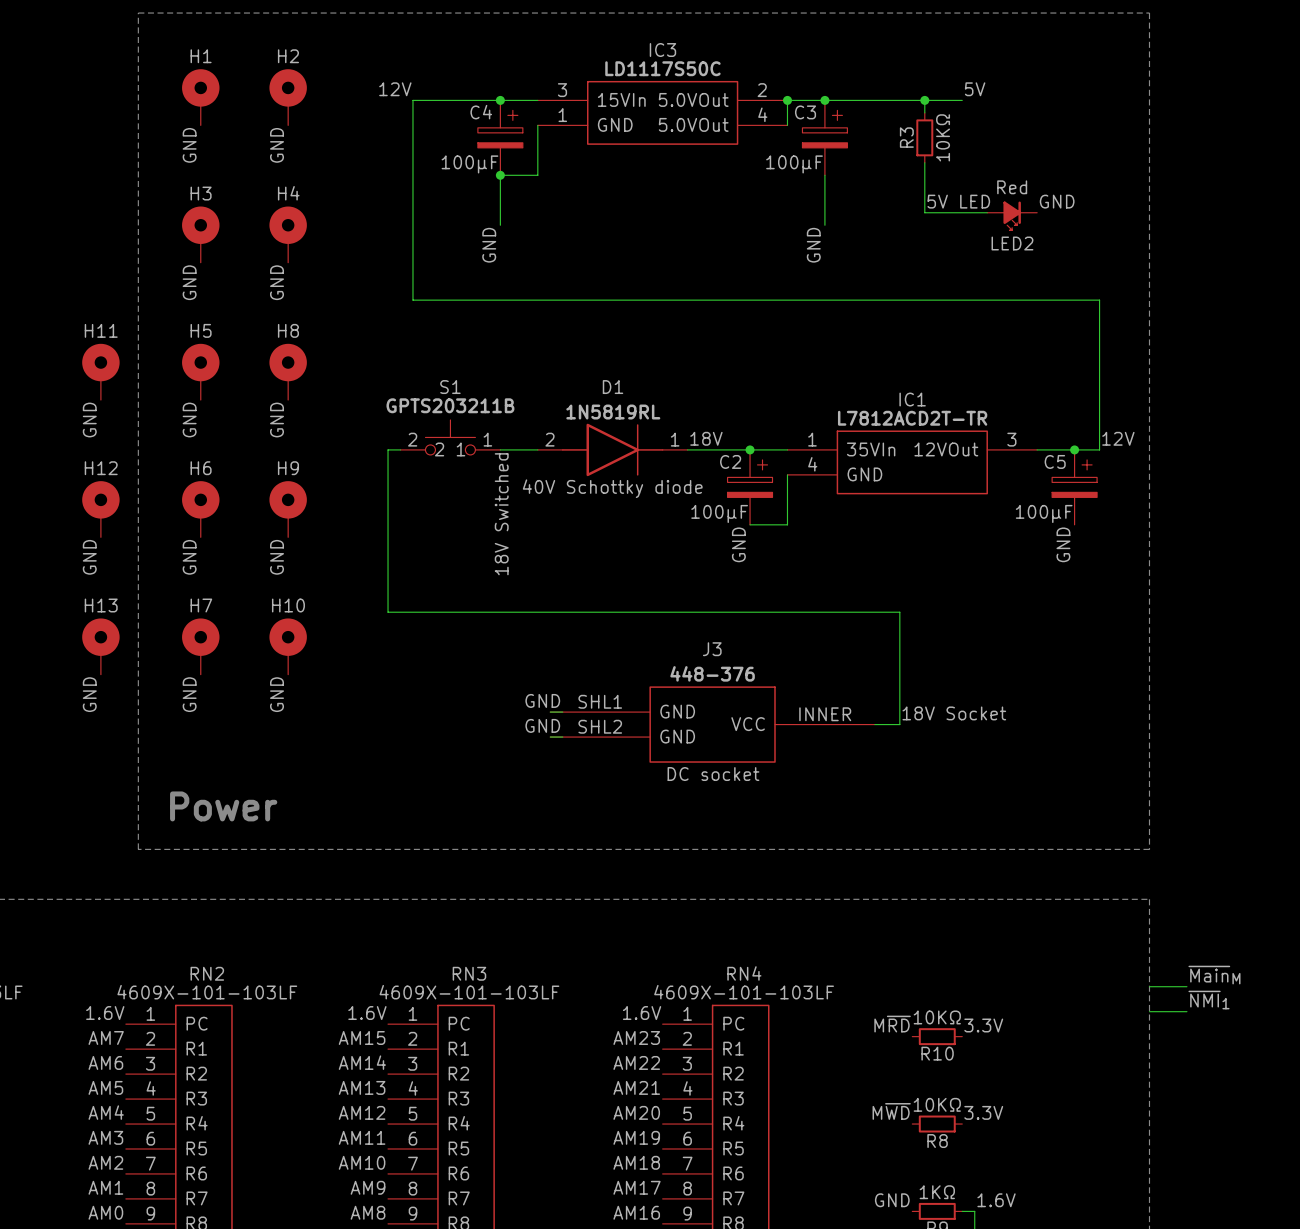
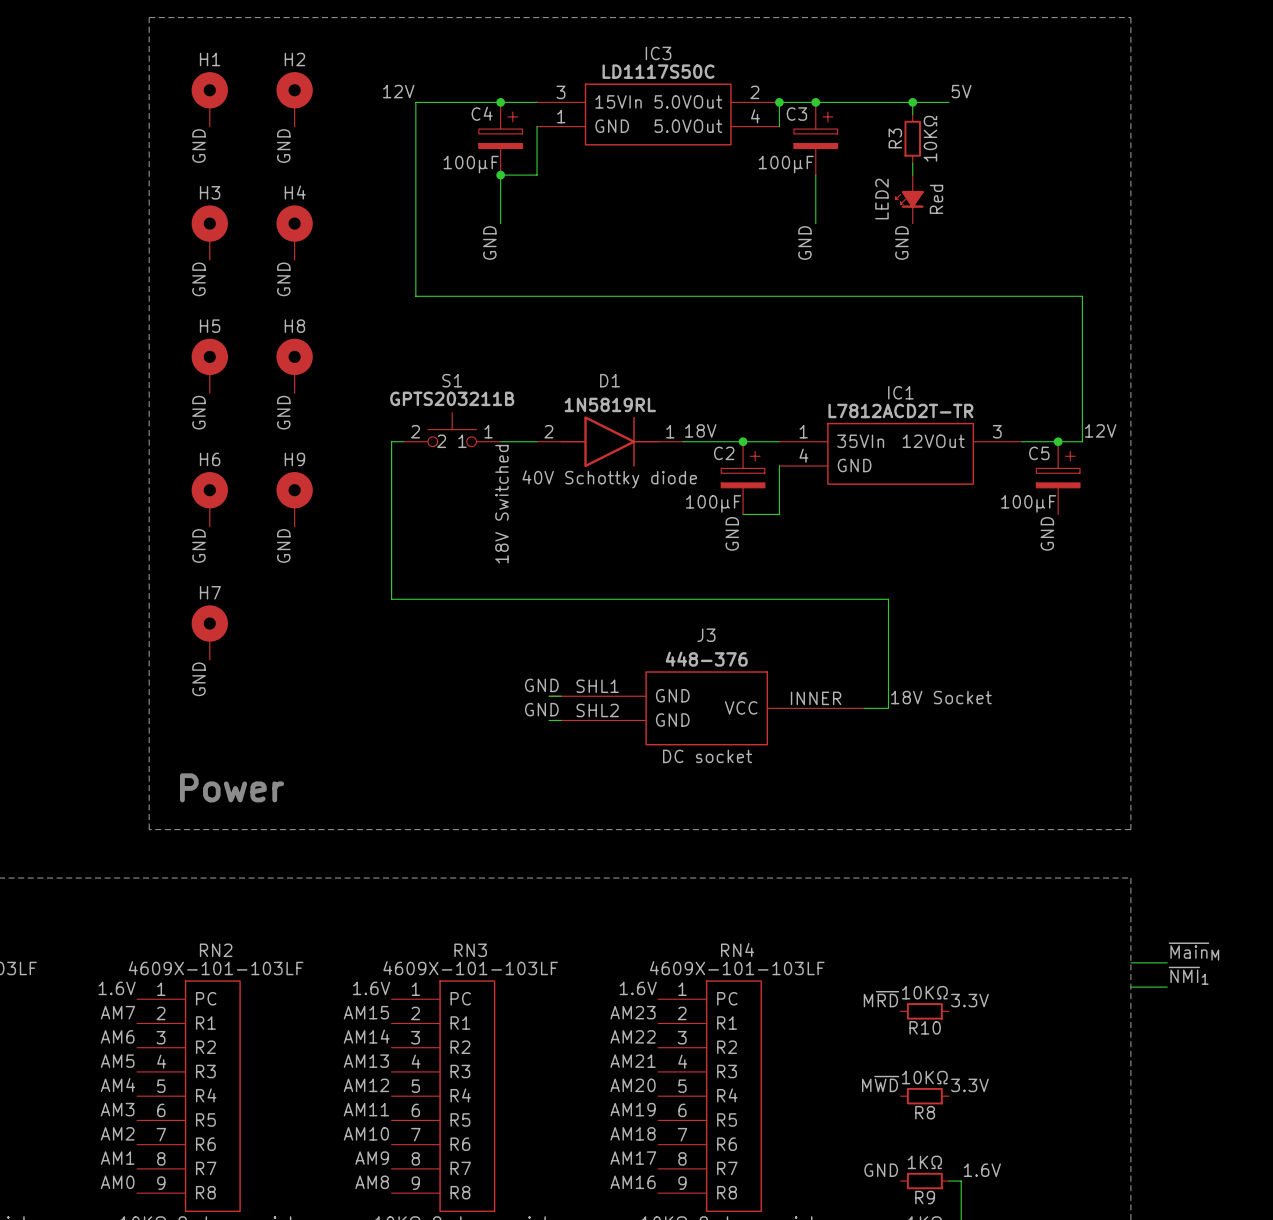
wire: (924, 175) (924, 212) (987, 212) -> none
label: 5V LED (958, 201) -> none
label rotation: 0° (1057, 201) -> 90° counterclockwise (901, 243)
label position: GND (1057, 201) -> GND (901, 243)
LED2 rotation: 0° (1012, 215) -> 90° clockwise (909, 199)
LED2 position: (1012, 215) -> (909, 199)
H11: (100, 371) -> none
label: GND (89, 420) -> none
H12: (100, 509) -> none
label: GND (89, 557) -> none
H13: (100, 646) -> none
H10: (288, 646) -> none
label: GND (89, 694) -> none
label: GND (277, 694) -> none

